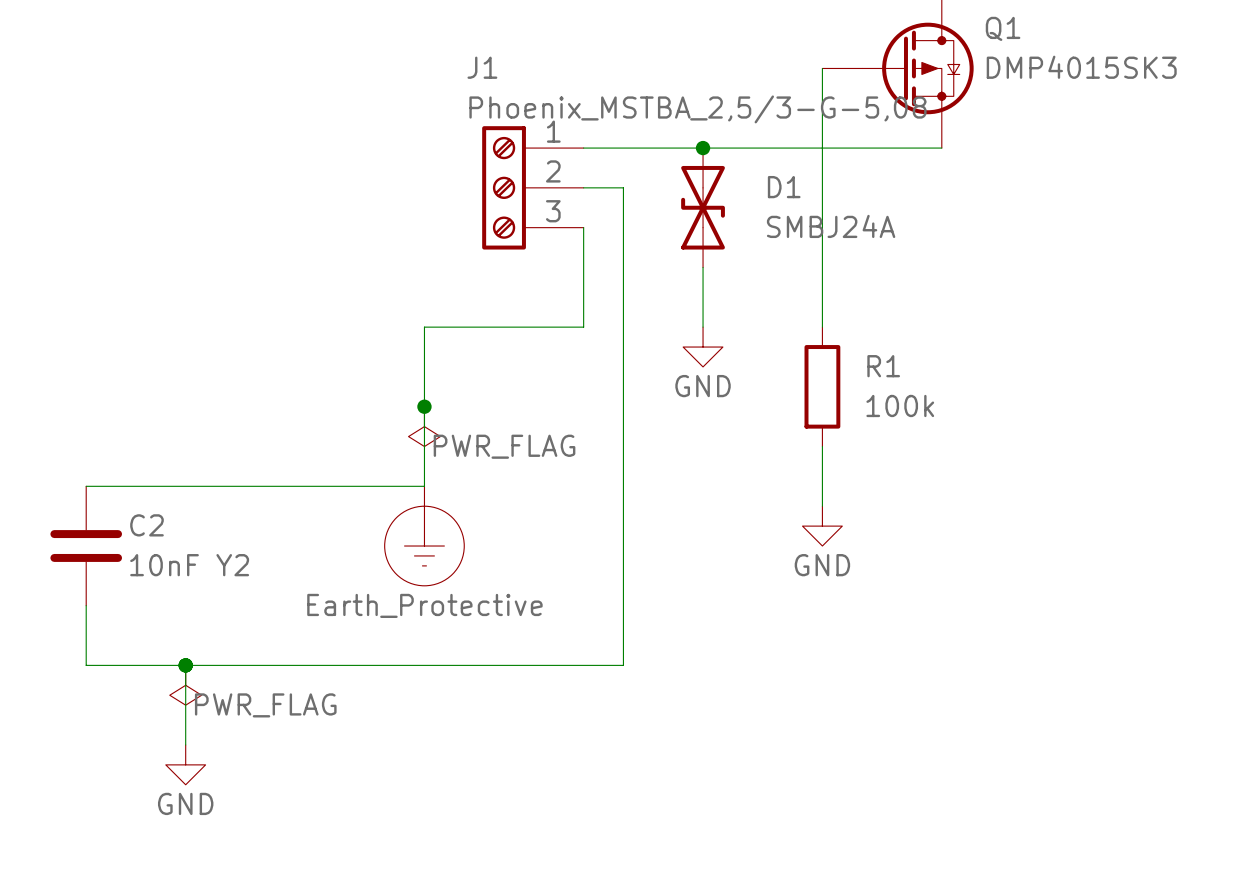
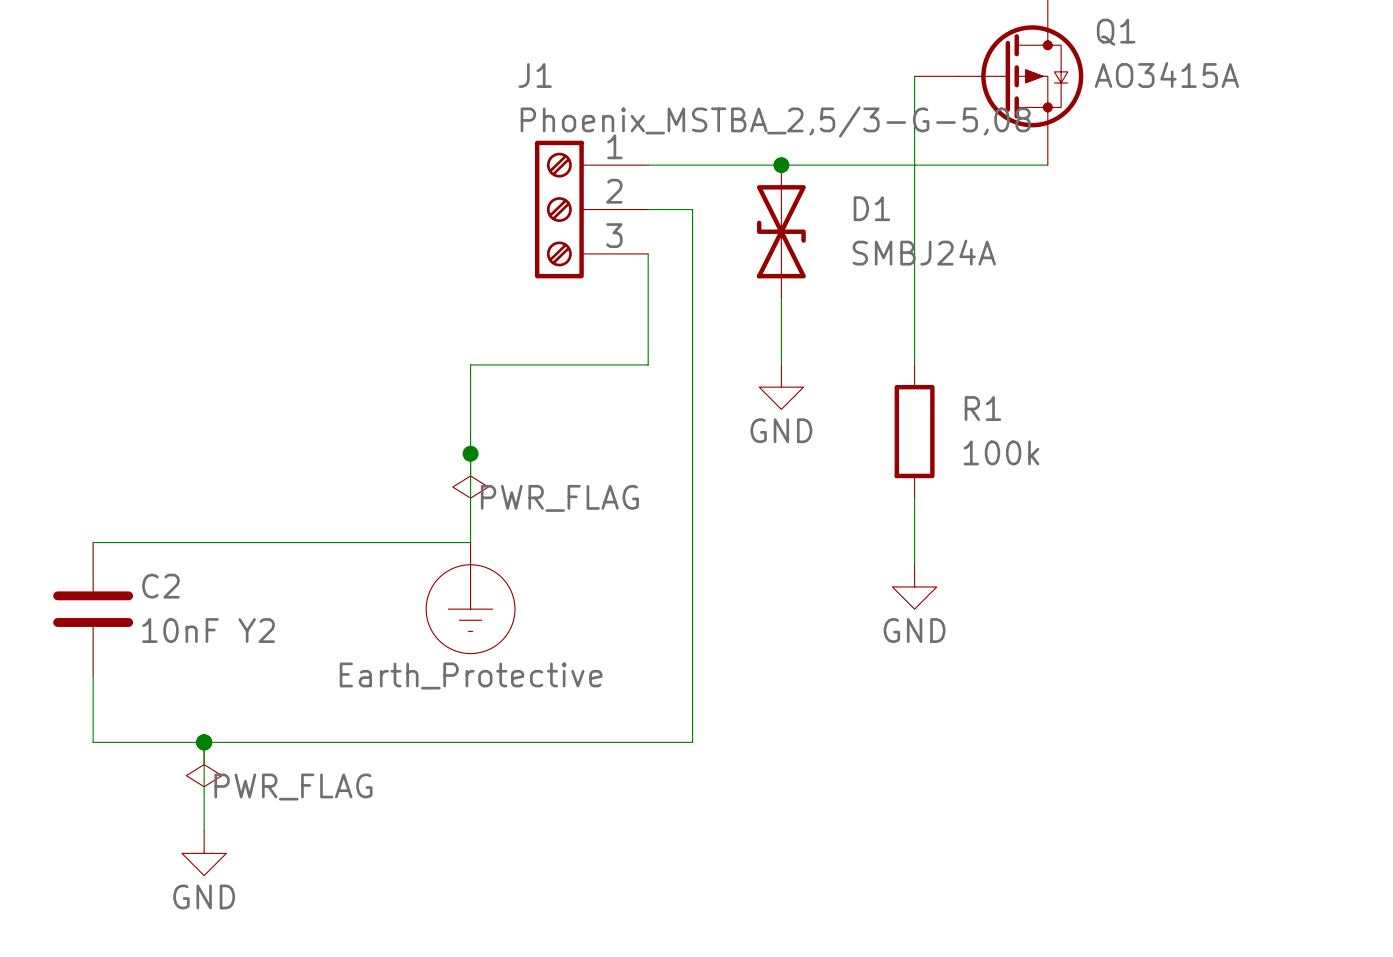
Q1 value: DMP4015SK3 (1081, 67) -> AO3415A (1166, 74)

